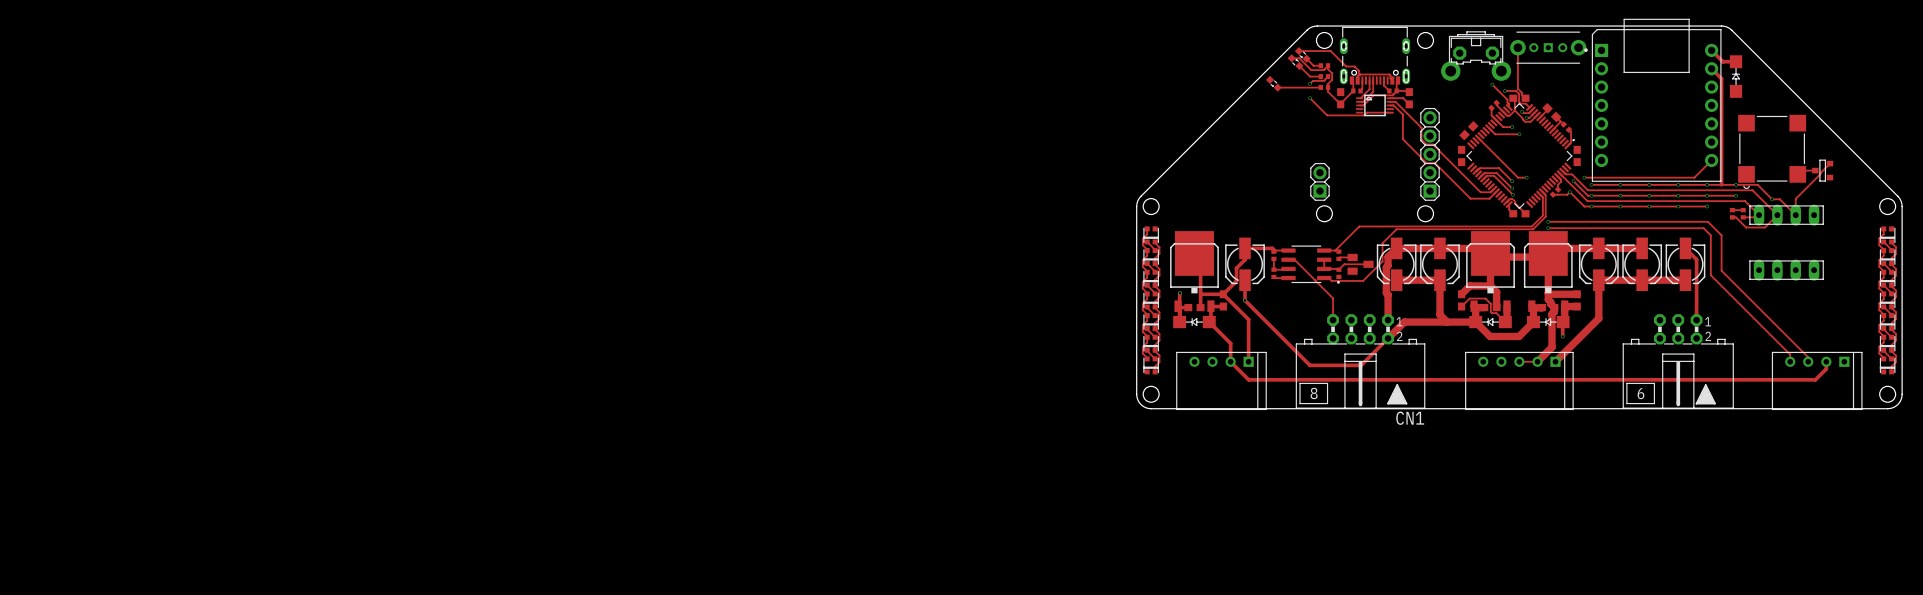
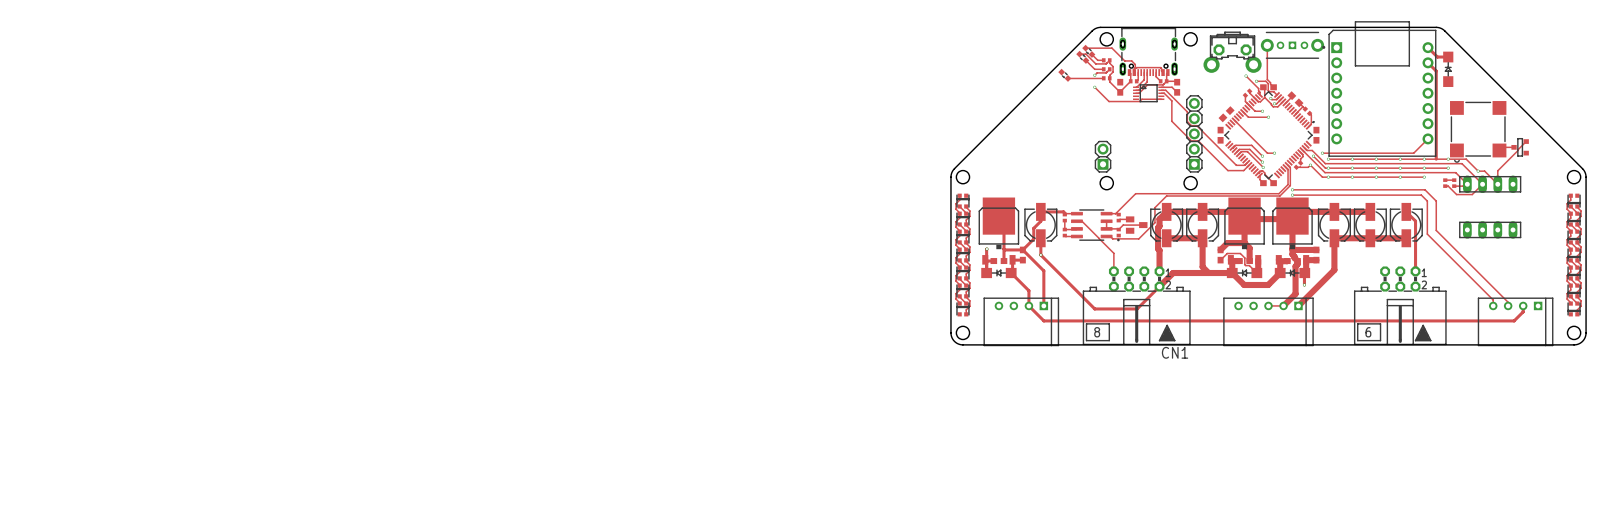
part rotation: 0° (1151, 235) -> 180° (962, 201)
part rotation: 0° (1151, 257) -> 180° (962, 219)
part rotation: 0° (1151, 278) -> 180° (962, 237)
part rotation: 0° (1151, 300) -> 180° (962, 255)
part rotation: 0° (1151, 322) -> 180° (962, 273)
part rotation: 0° (1151, 343) -> 180° (962, 290)
part rotation: 0° (1151, 365) -> 180° (962, 308)

